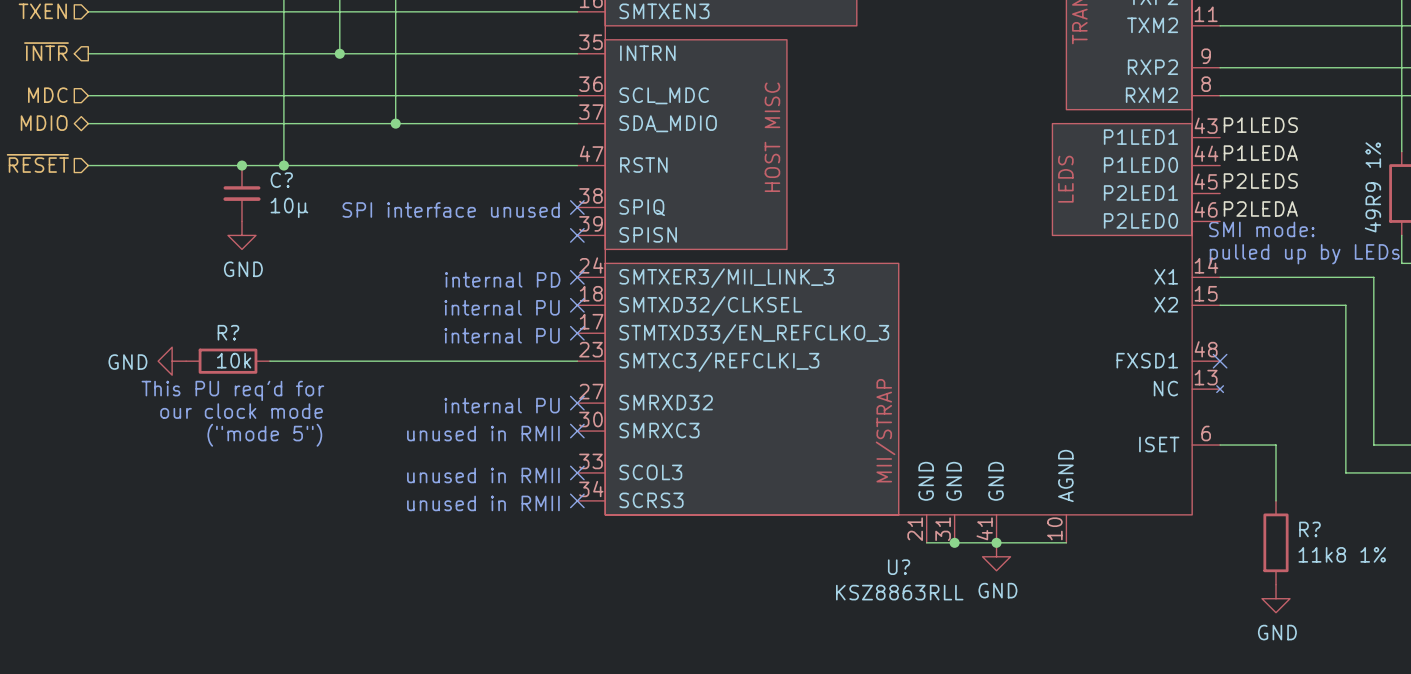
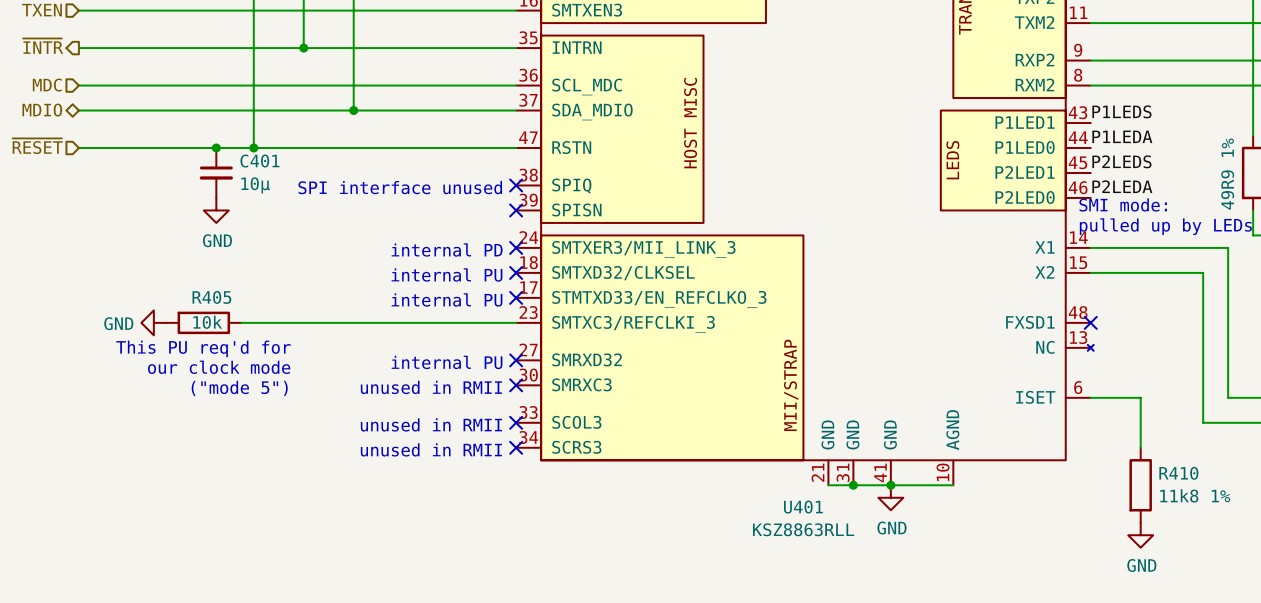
C? name: C? (281, 180) -> C401 (259, 161)
R? name: R? (228, 332) -> R405 (211, 297)
R? name: R? (1309, 529) -> R410 (1178, 473)
U? name: U? (899, 567) -> U401 (803, 507)

